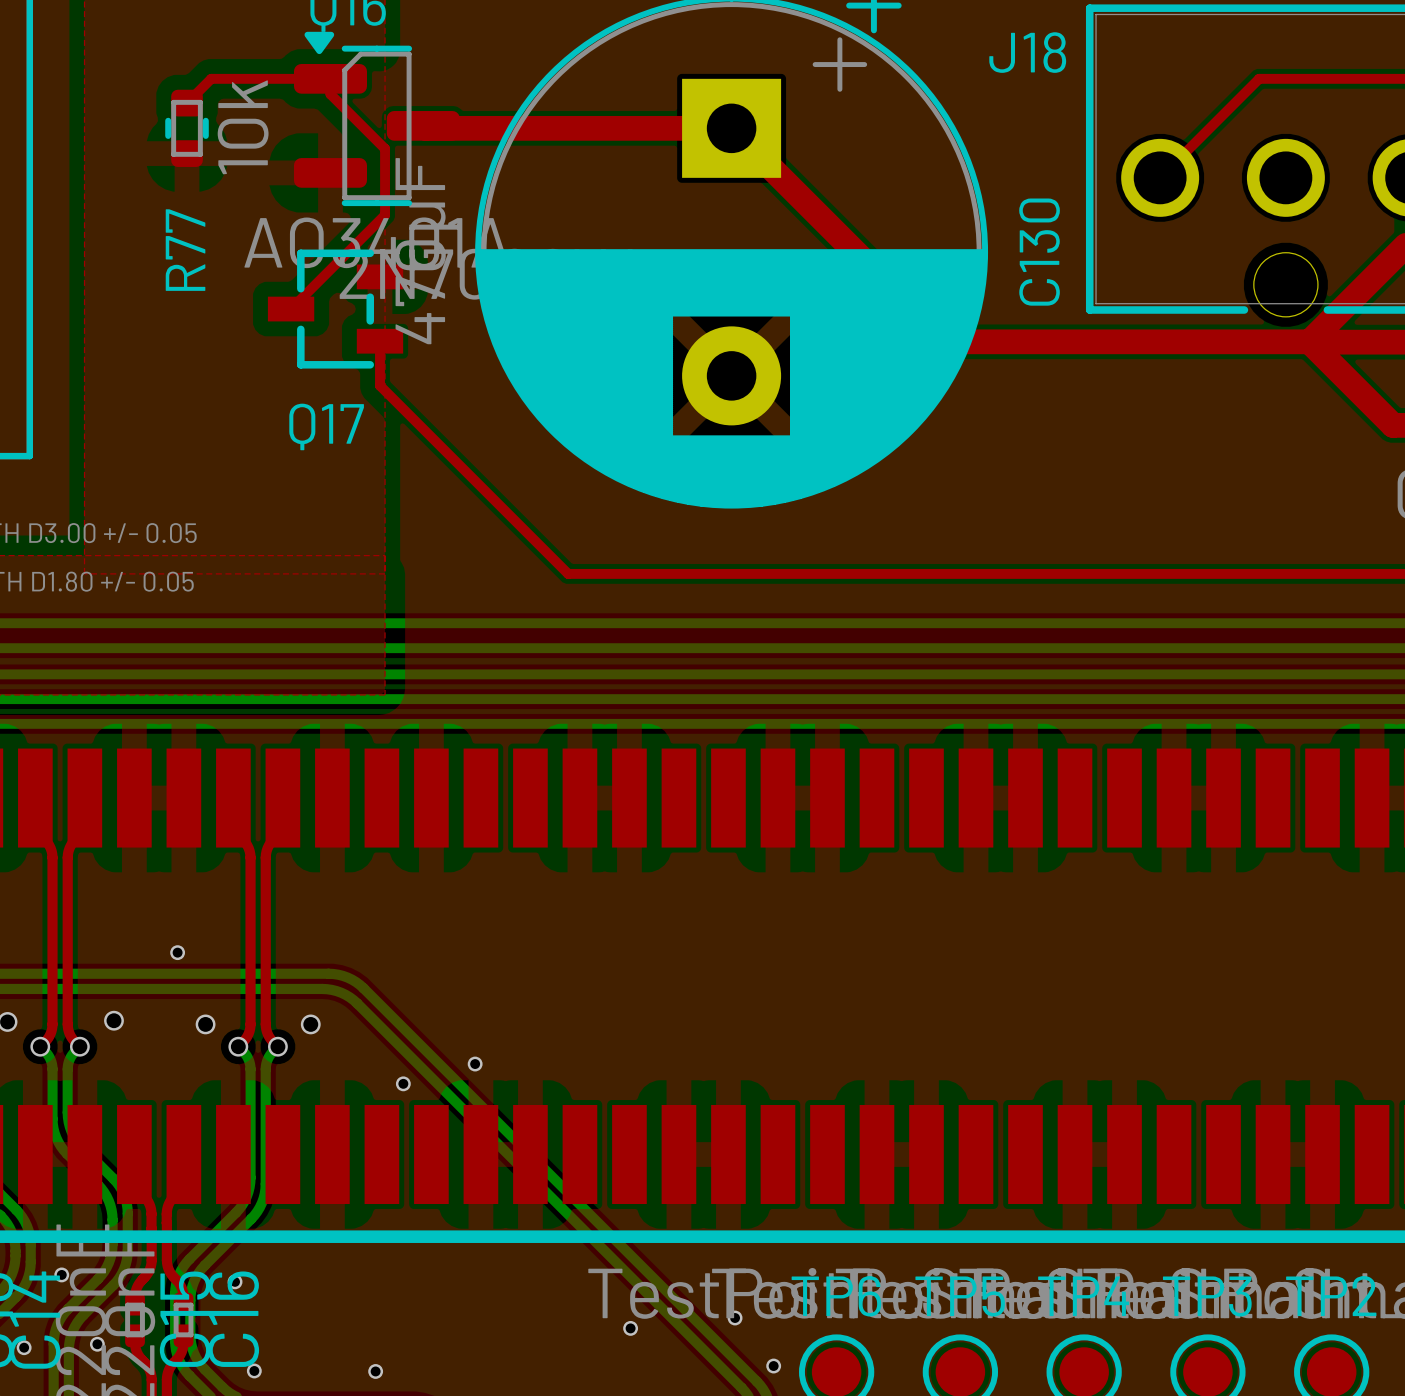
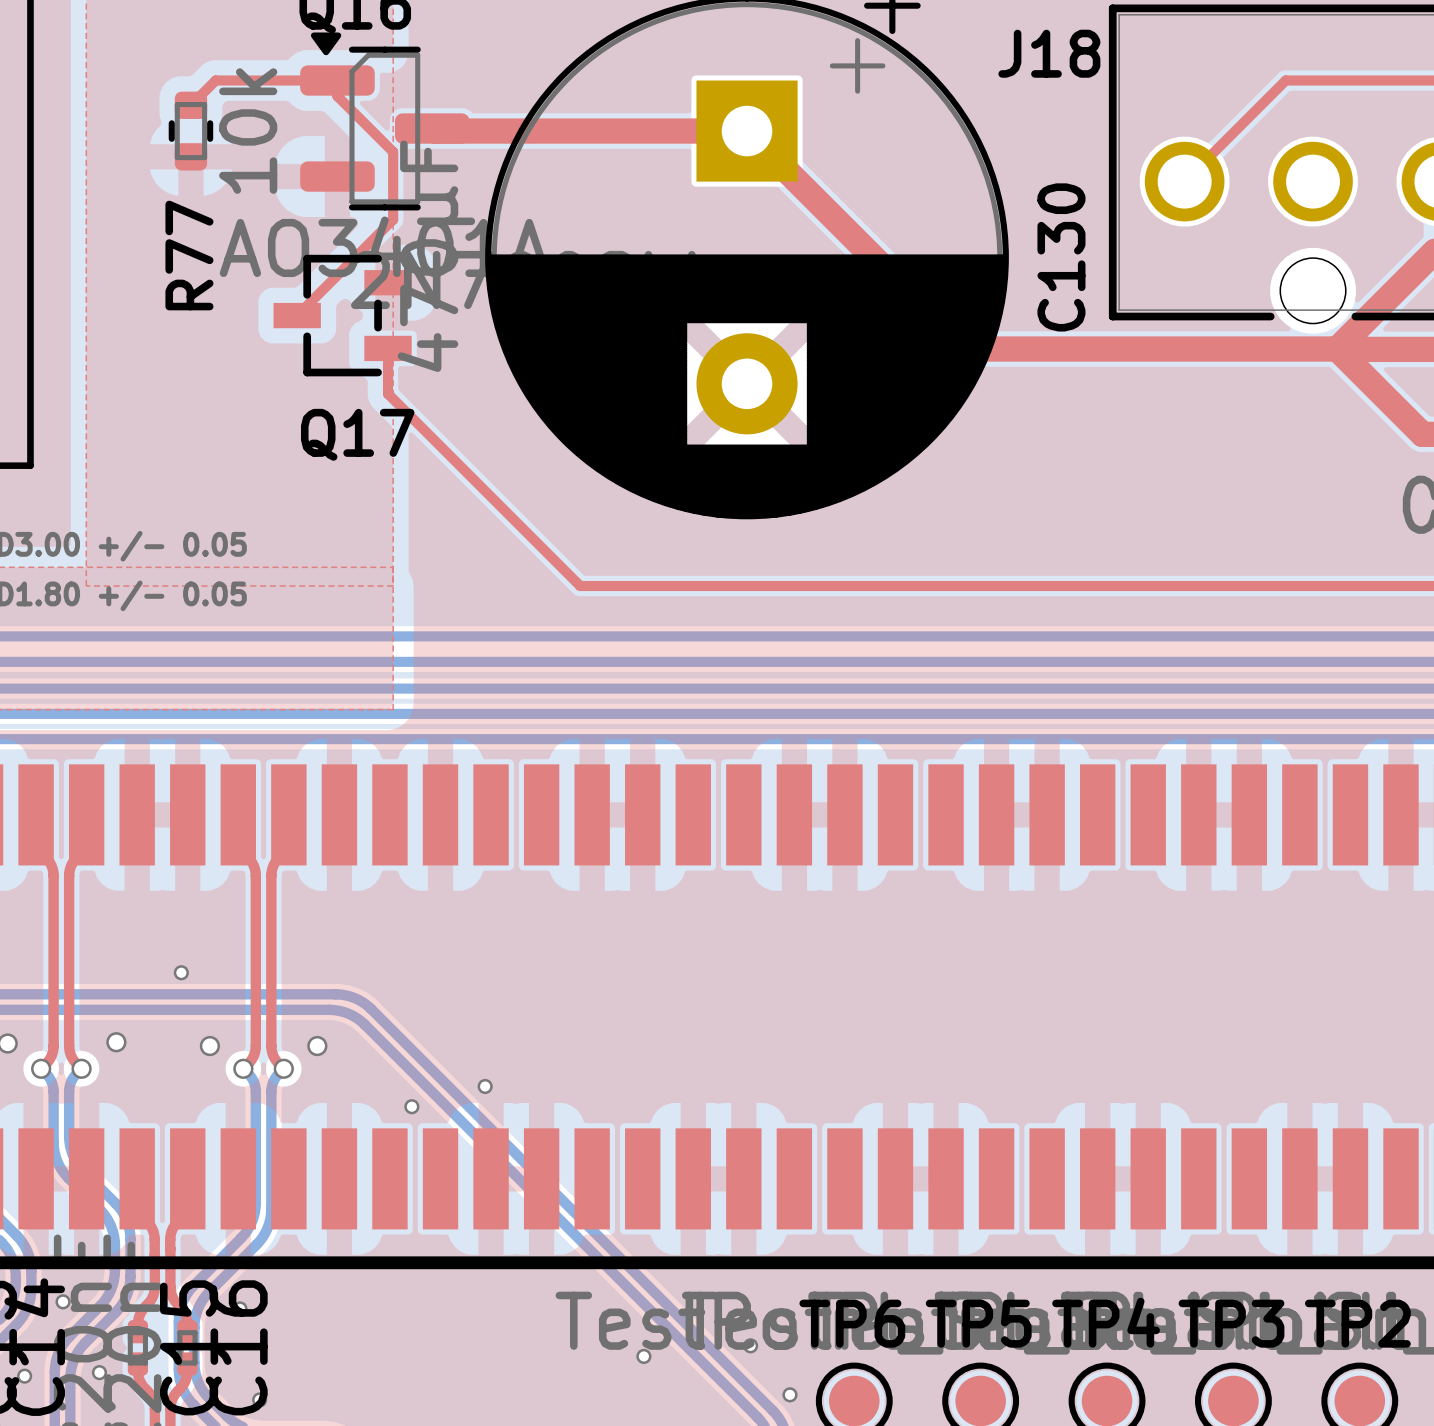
via: (375, 1371) -> none

